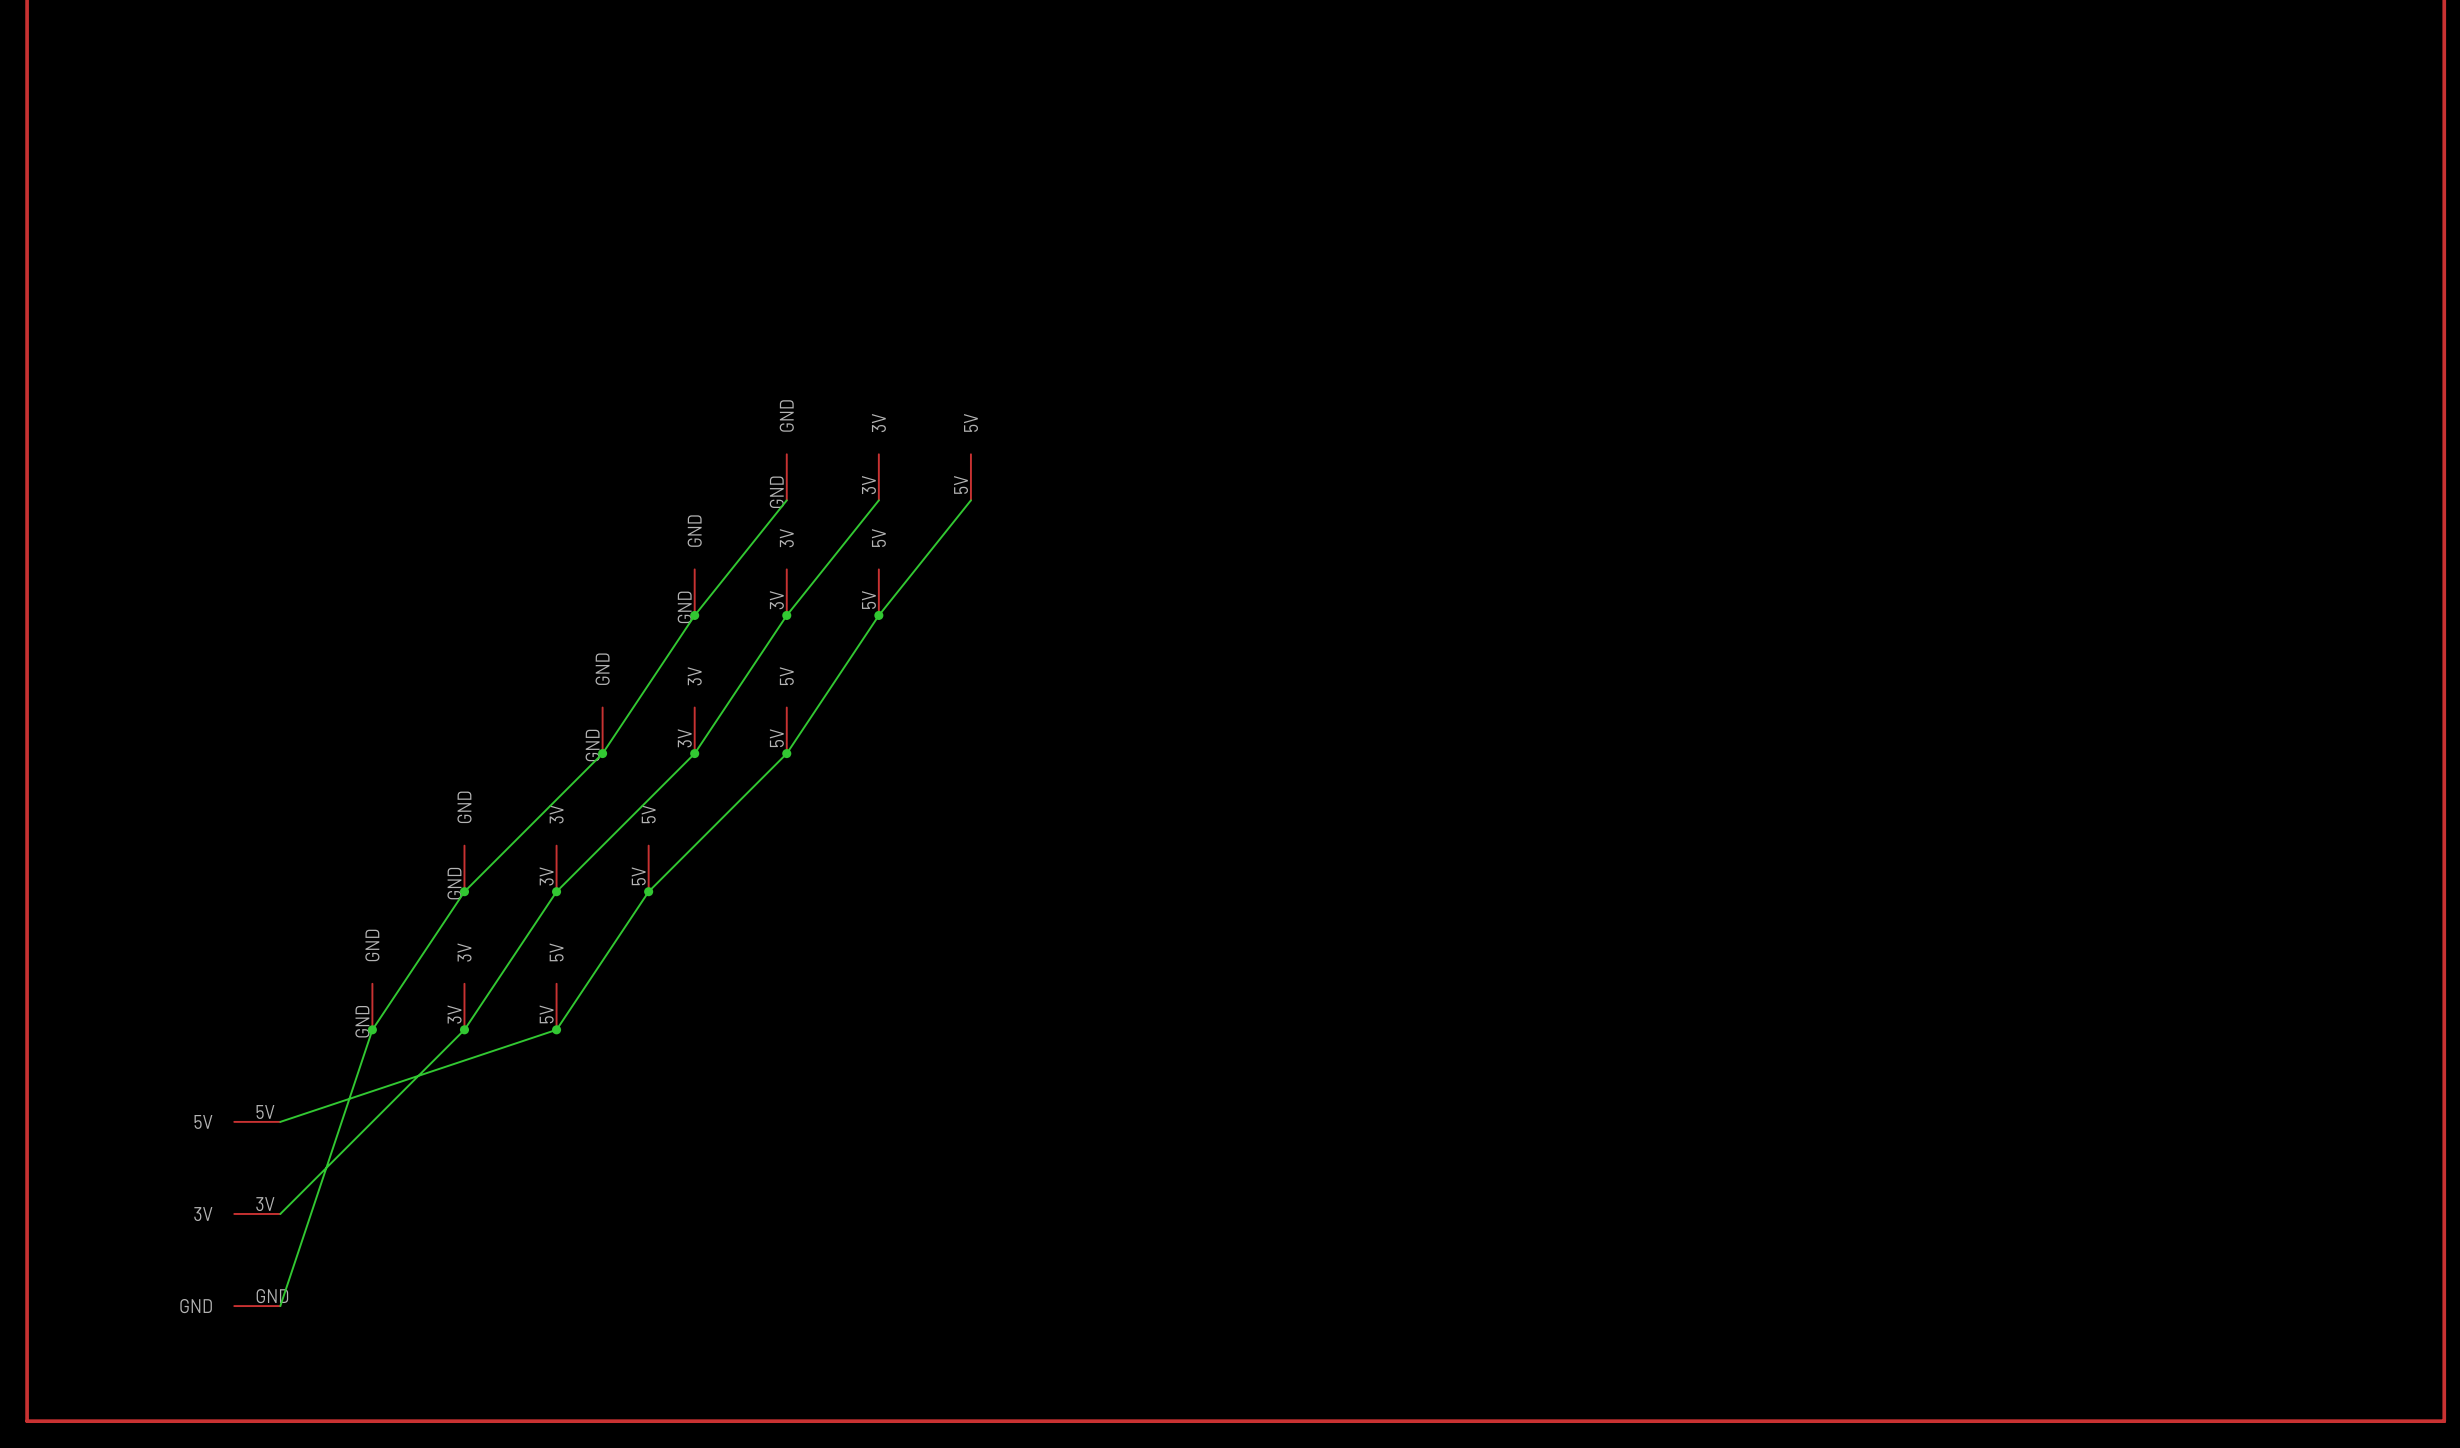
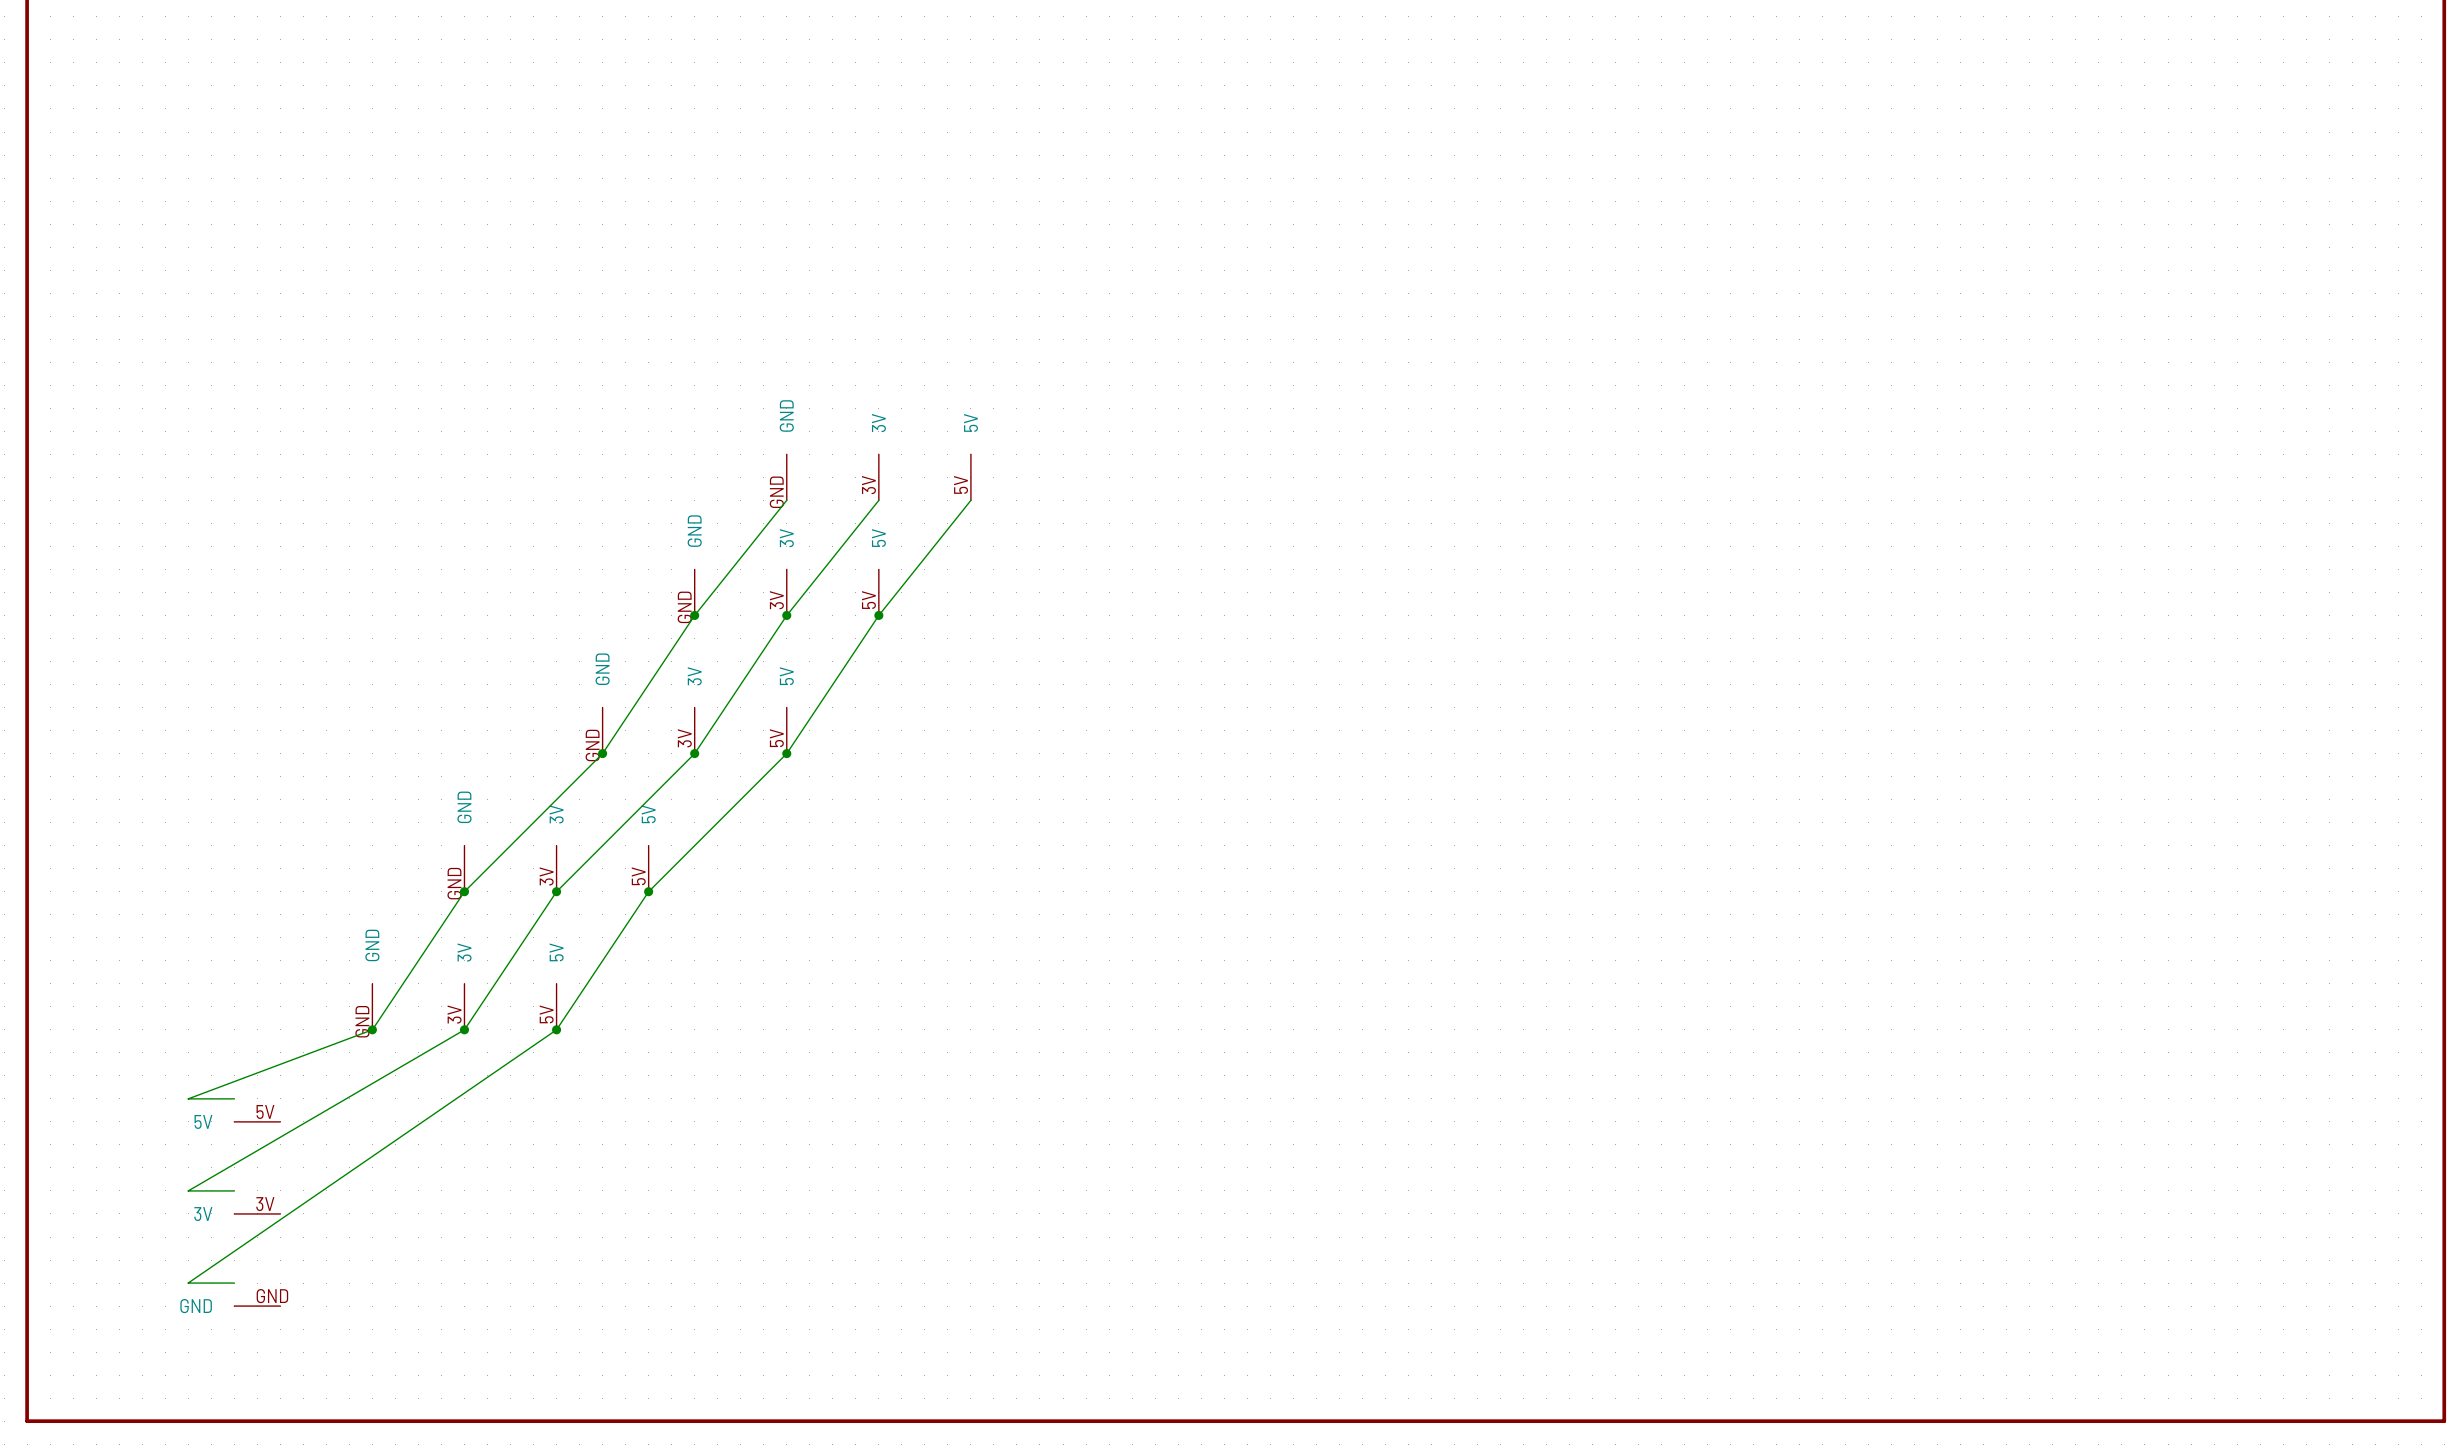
wire: (372, 1029) (280, 1306) -> (372, 1029) (188, 1098) (234, 1098)
wire: (464, 1029) (280, 1213) -> (464, 1029) (188, 1190) (234, 1190)
wire: (556, 1029) (280, 1121) -> (556, 1029) (188, 1283) (234, 1283)

